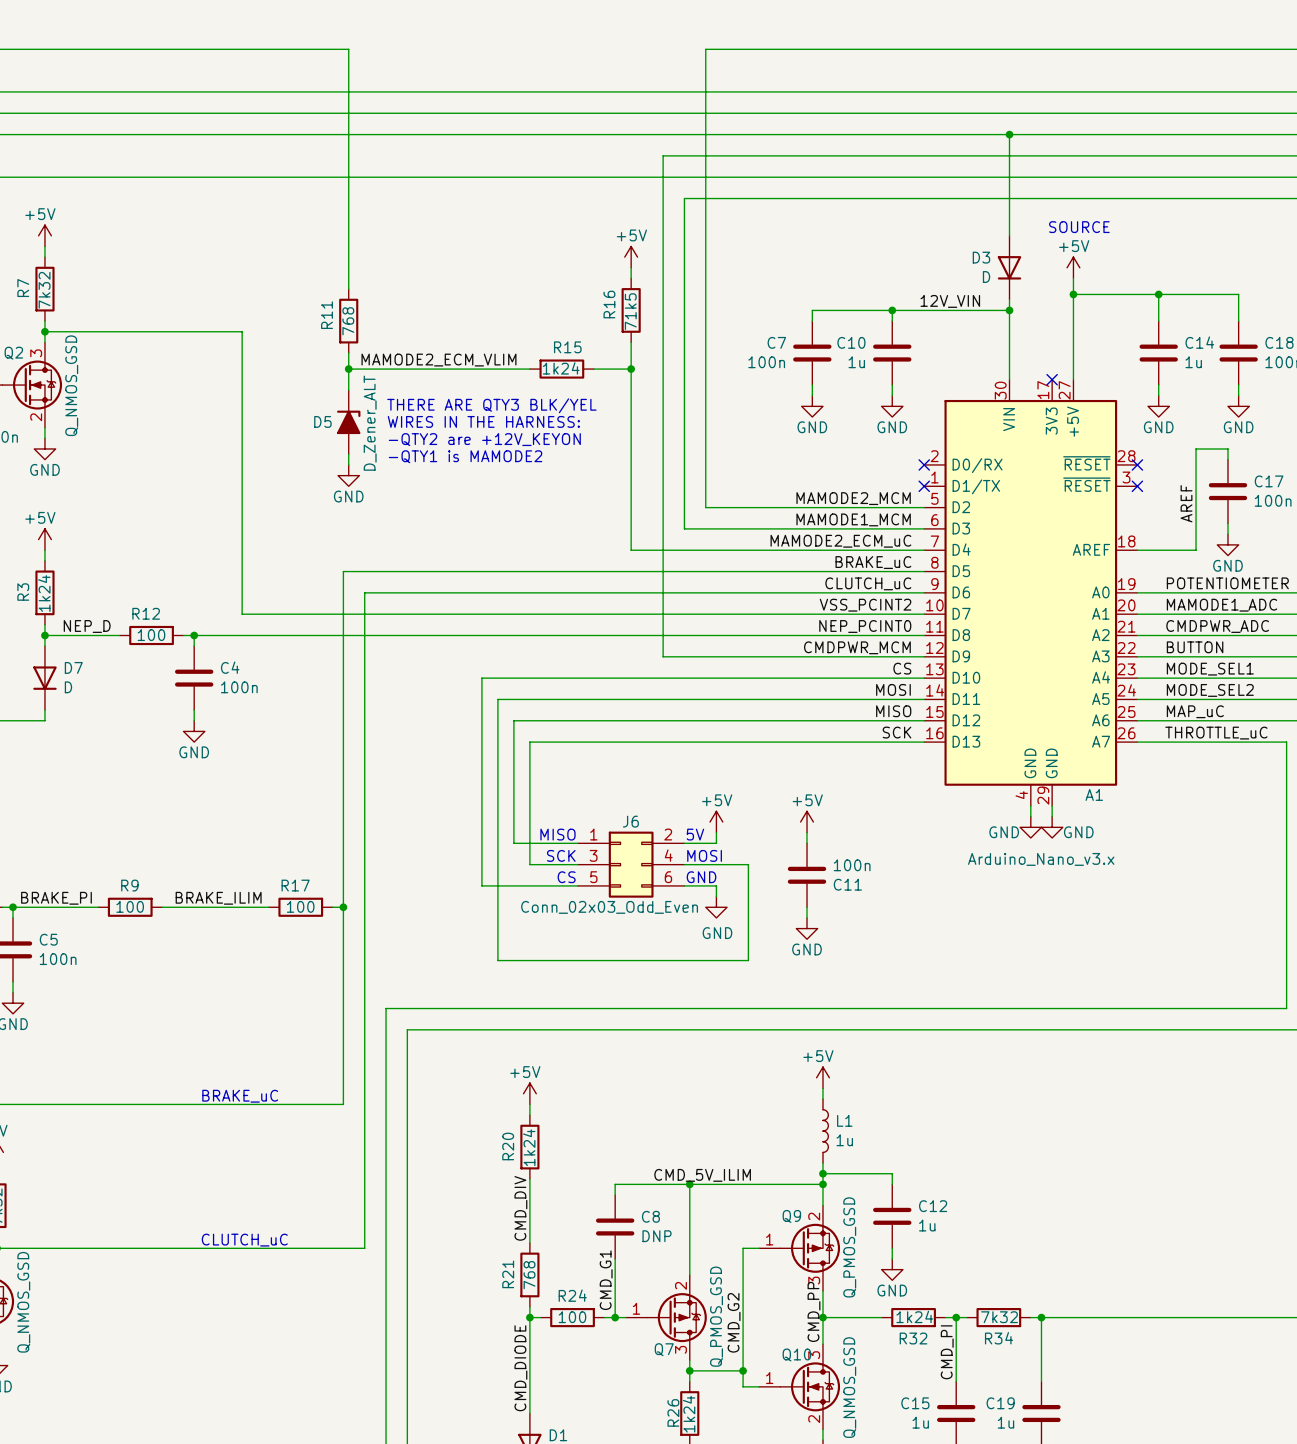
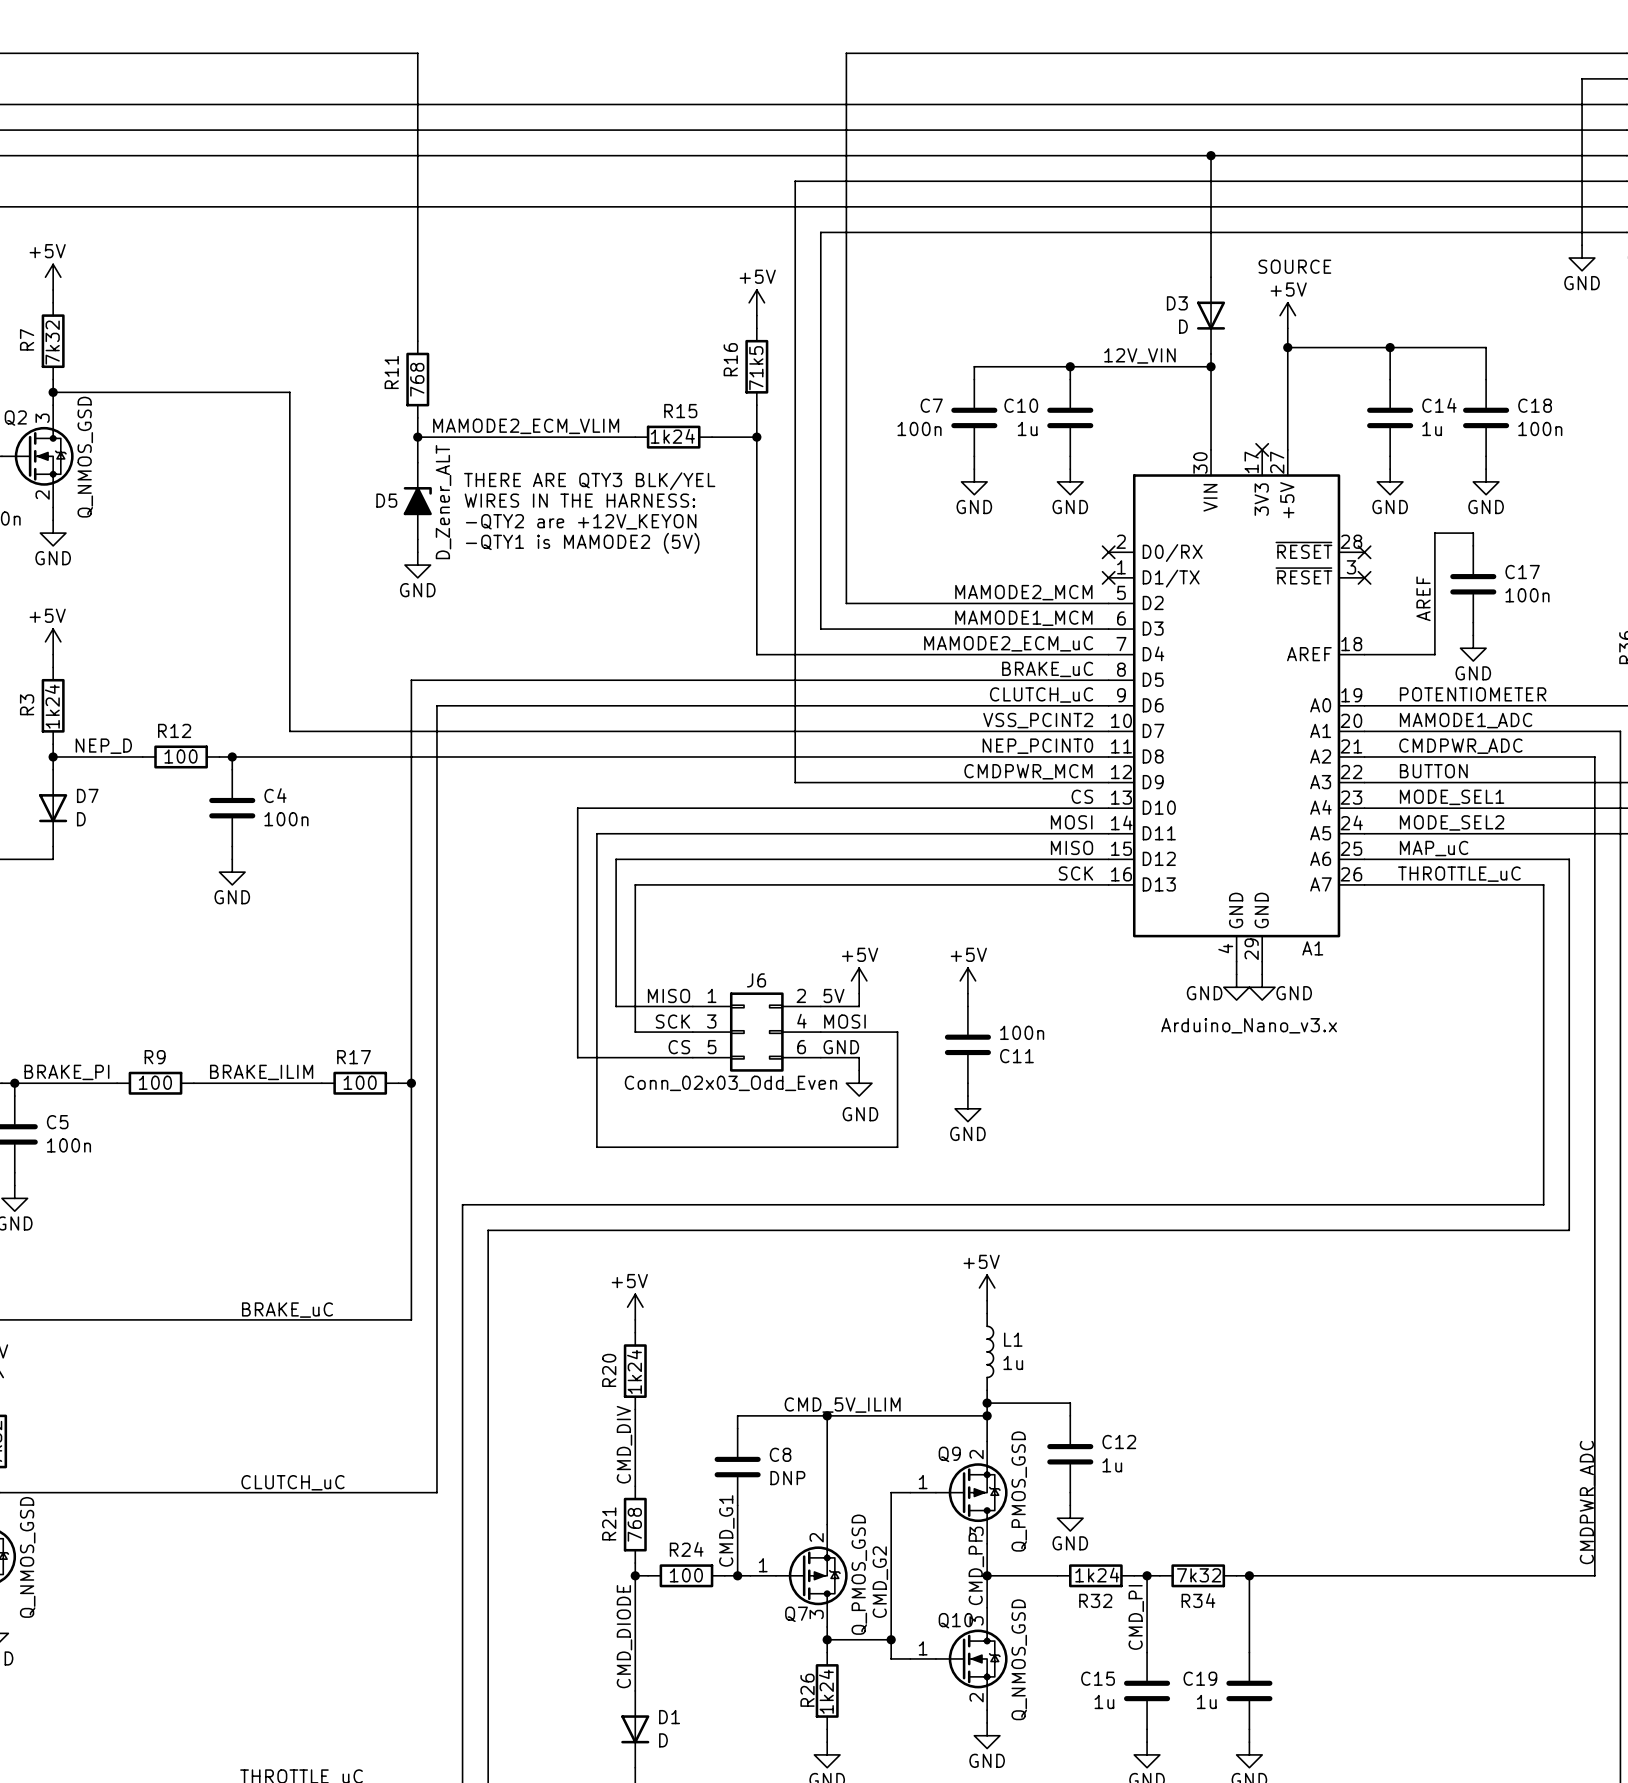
text: -QTY1 is MAMODE2 (465, 456) -> -QTY1 is MAMODE2 (5V) (582, 543)

